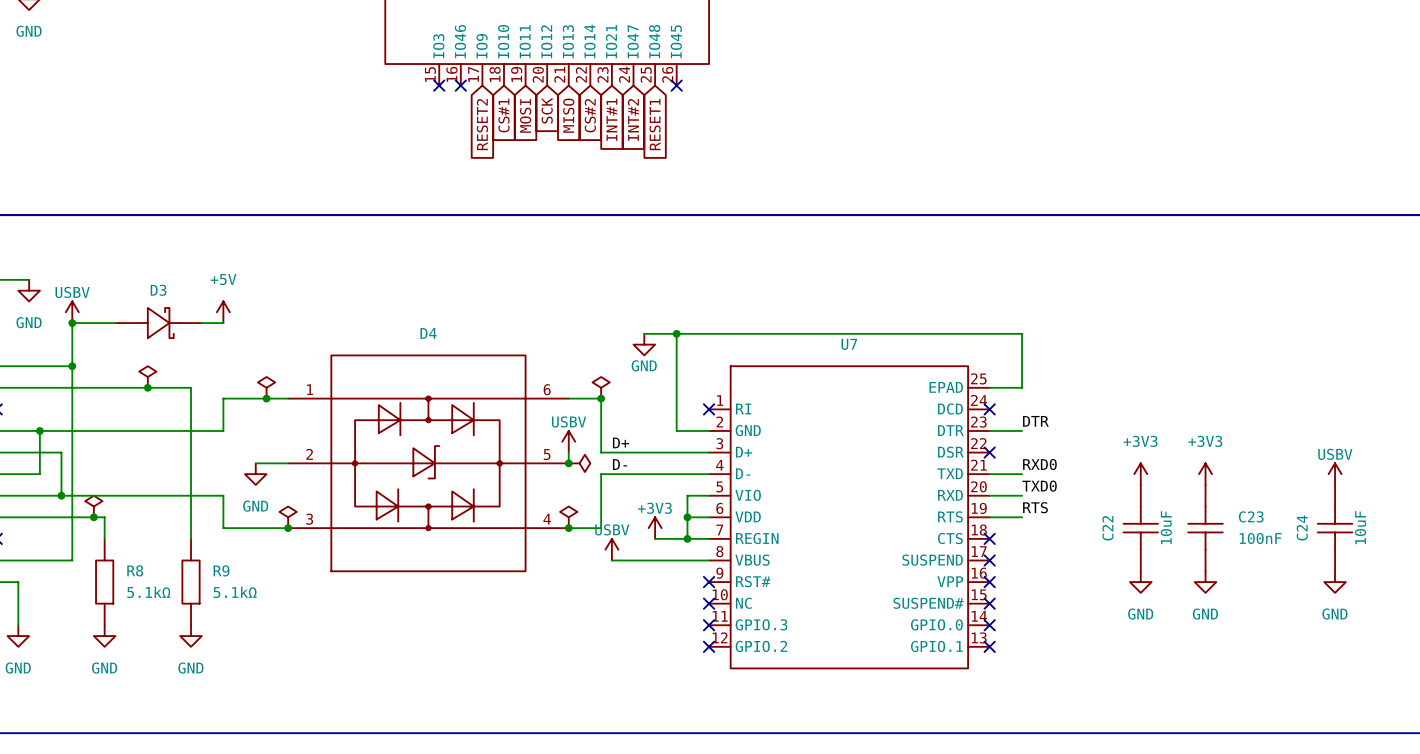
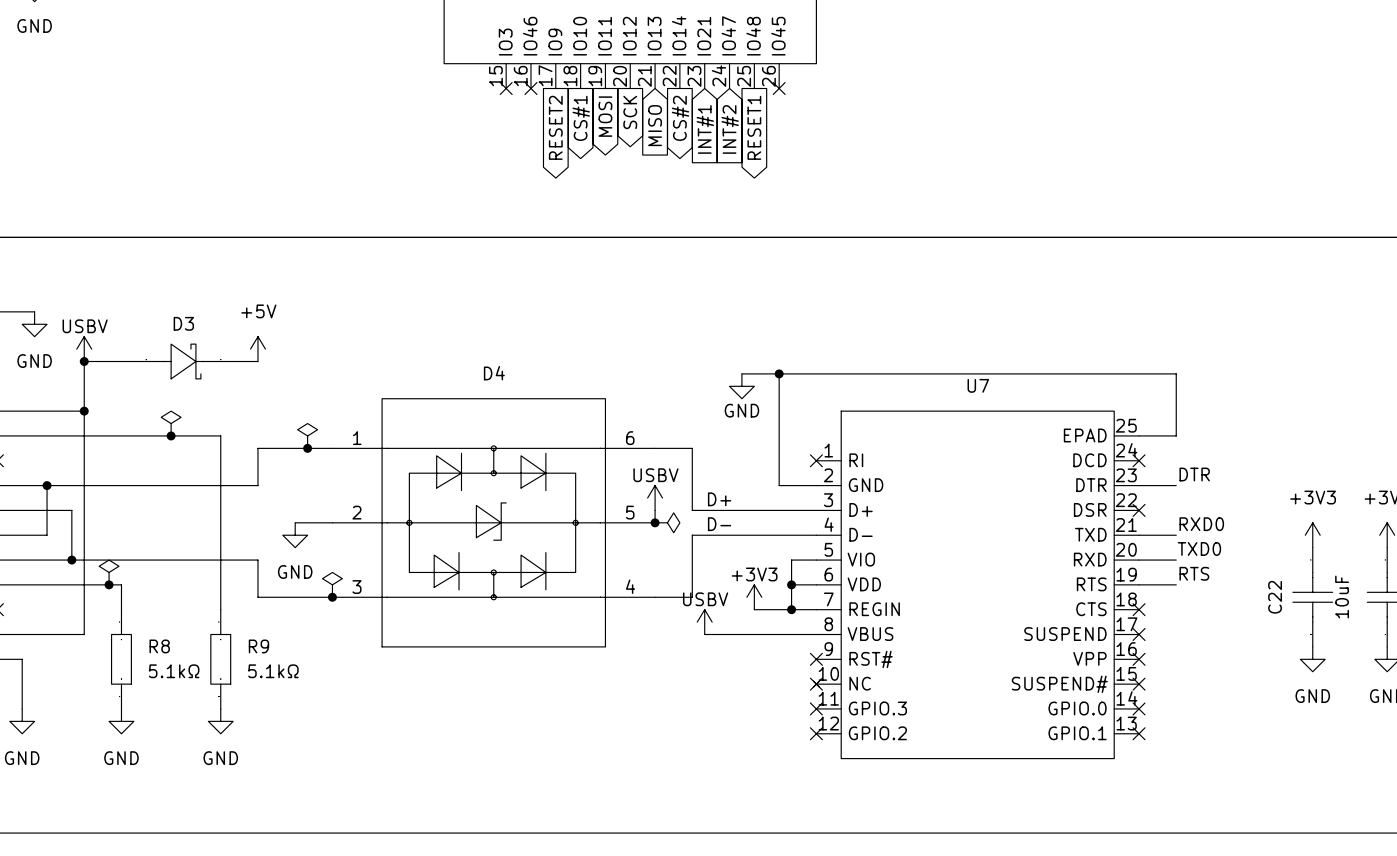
global label shape: input (547, 110) -> output (630, 112)
global label shape: input (504, 115) -> output (581, 118)
global label shape: input (590, 115) -> output (680, 118)
global label shape: input (525, 116) -> output (605, 116)
global label shape: input (482, 124) -> output (555, 127)
global label shape: input (655, 124) -> output (754, 127)
U7 symbol: [709, 366, 990, 669] -> [813, 411, 1140, 759]
power symbol: (601, 387) -> none
junction: (601, 398) -> none
power symbol: (568, 517) -> none
junction: (568, 528) -> none

